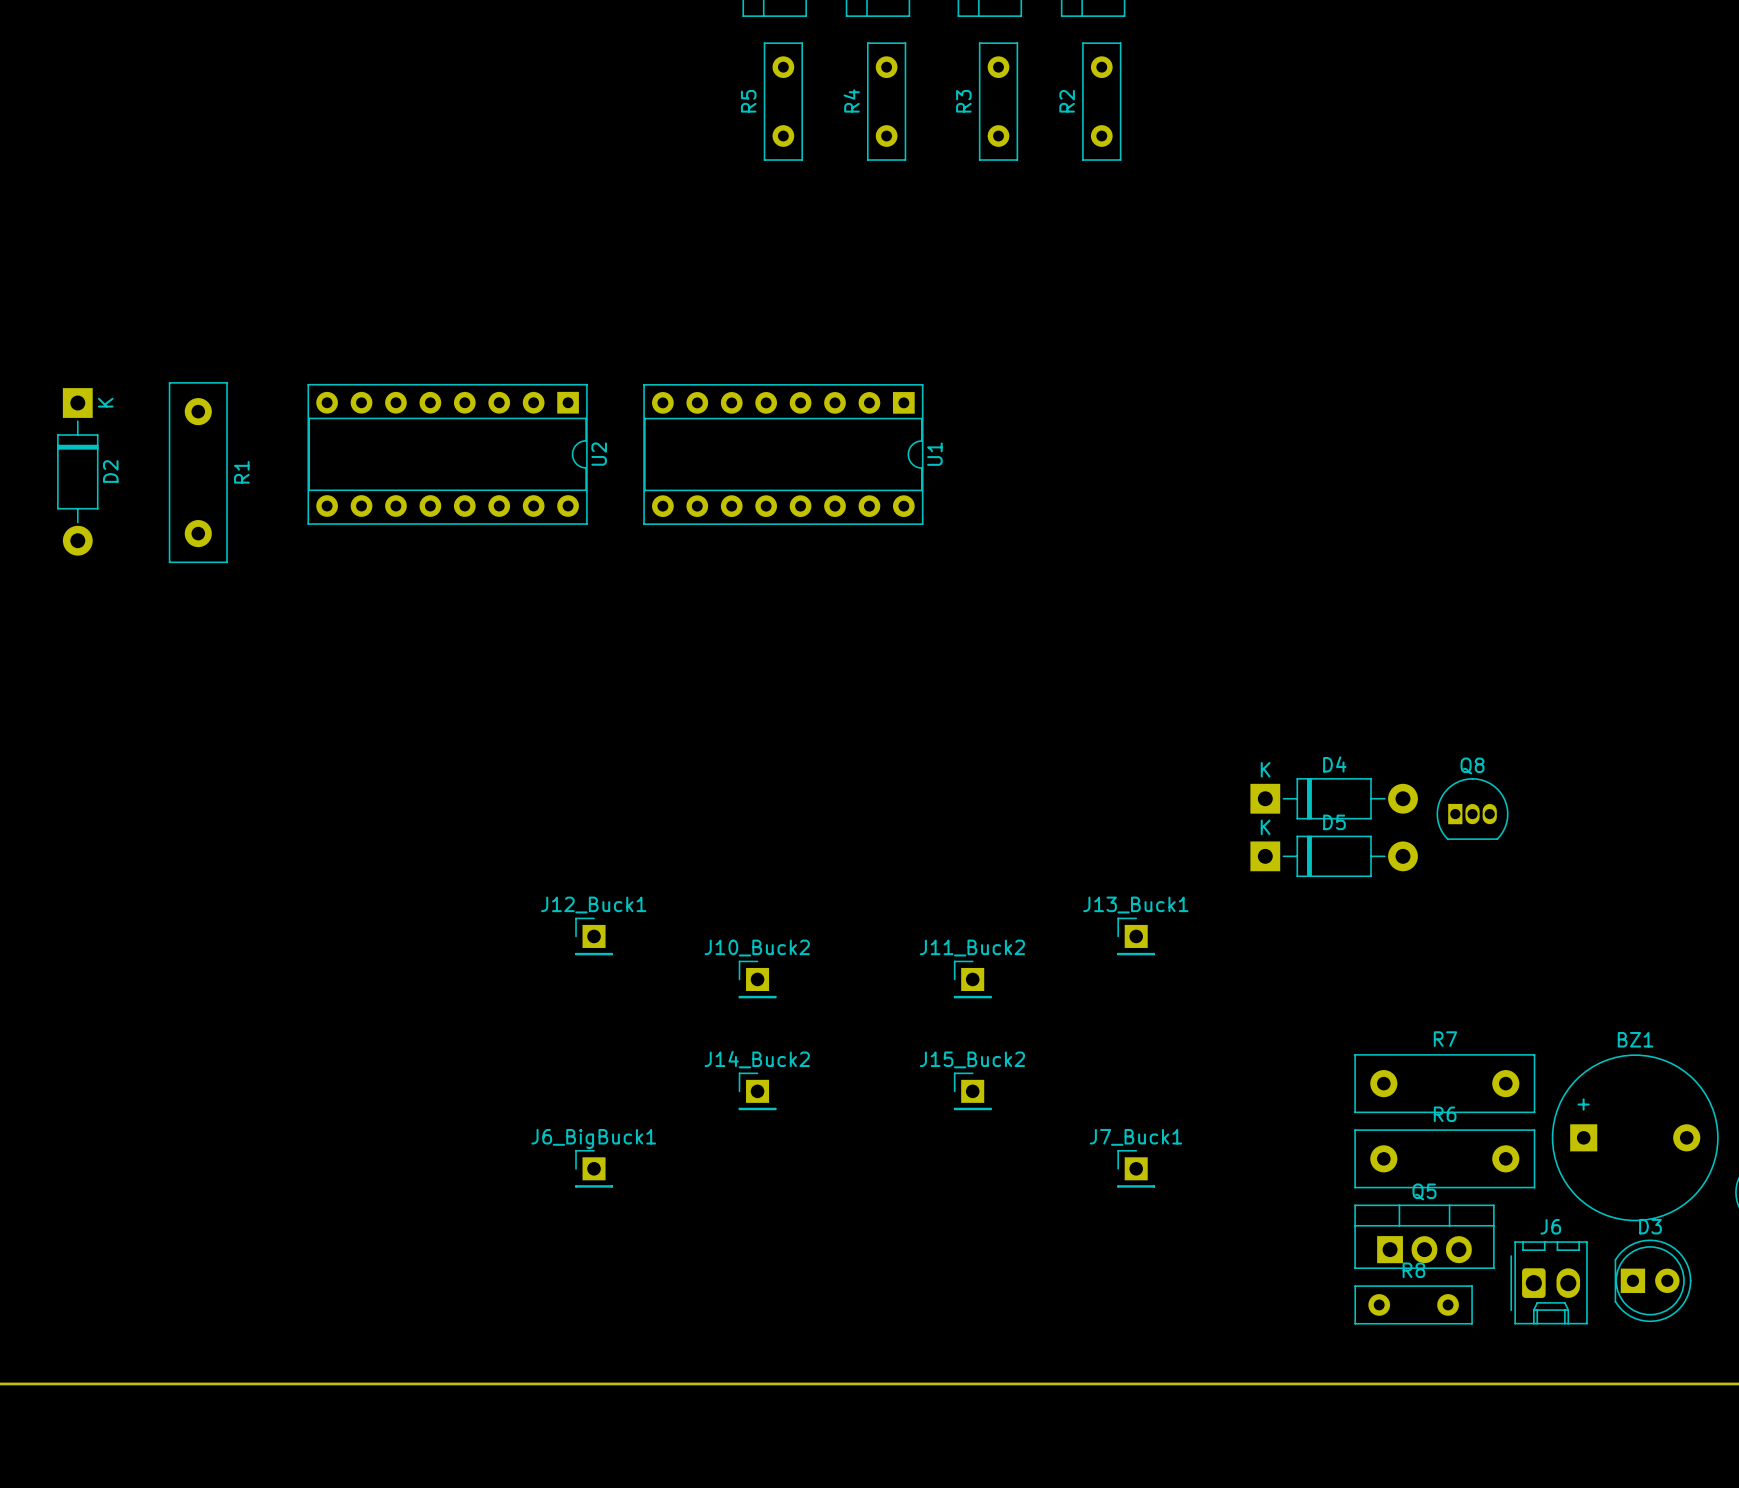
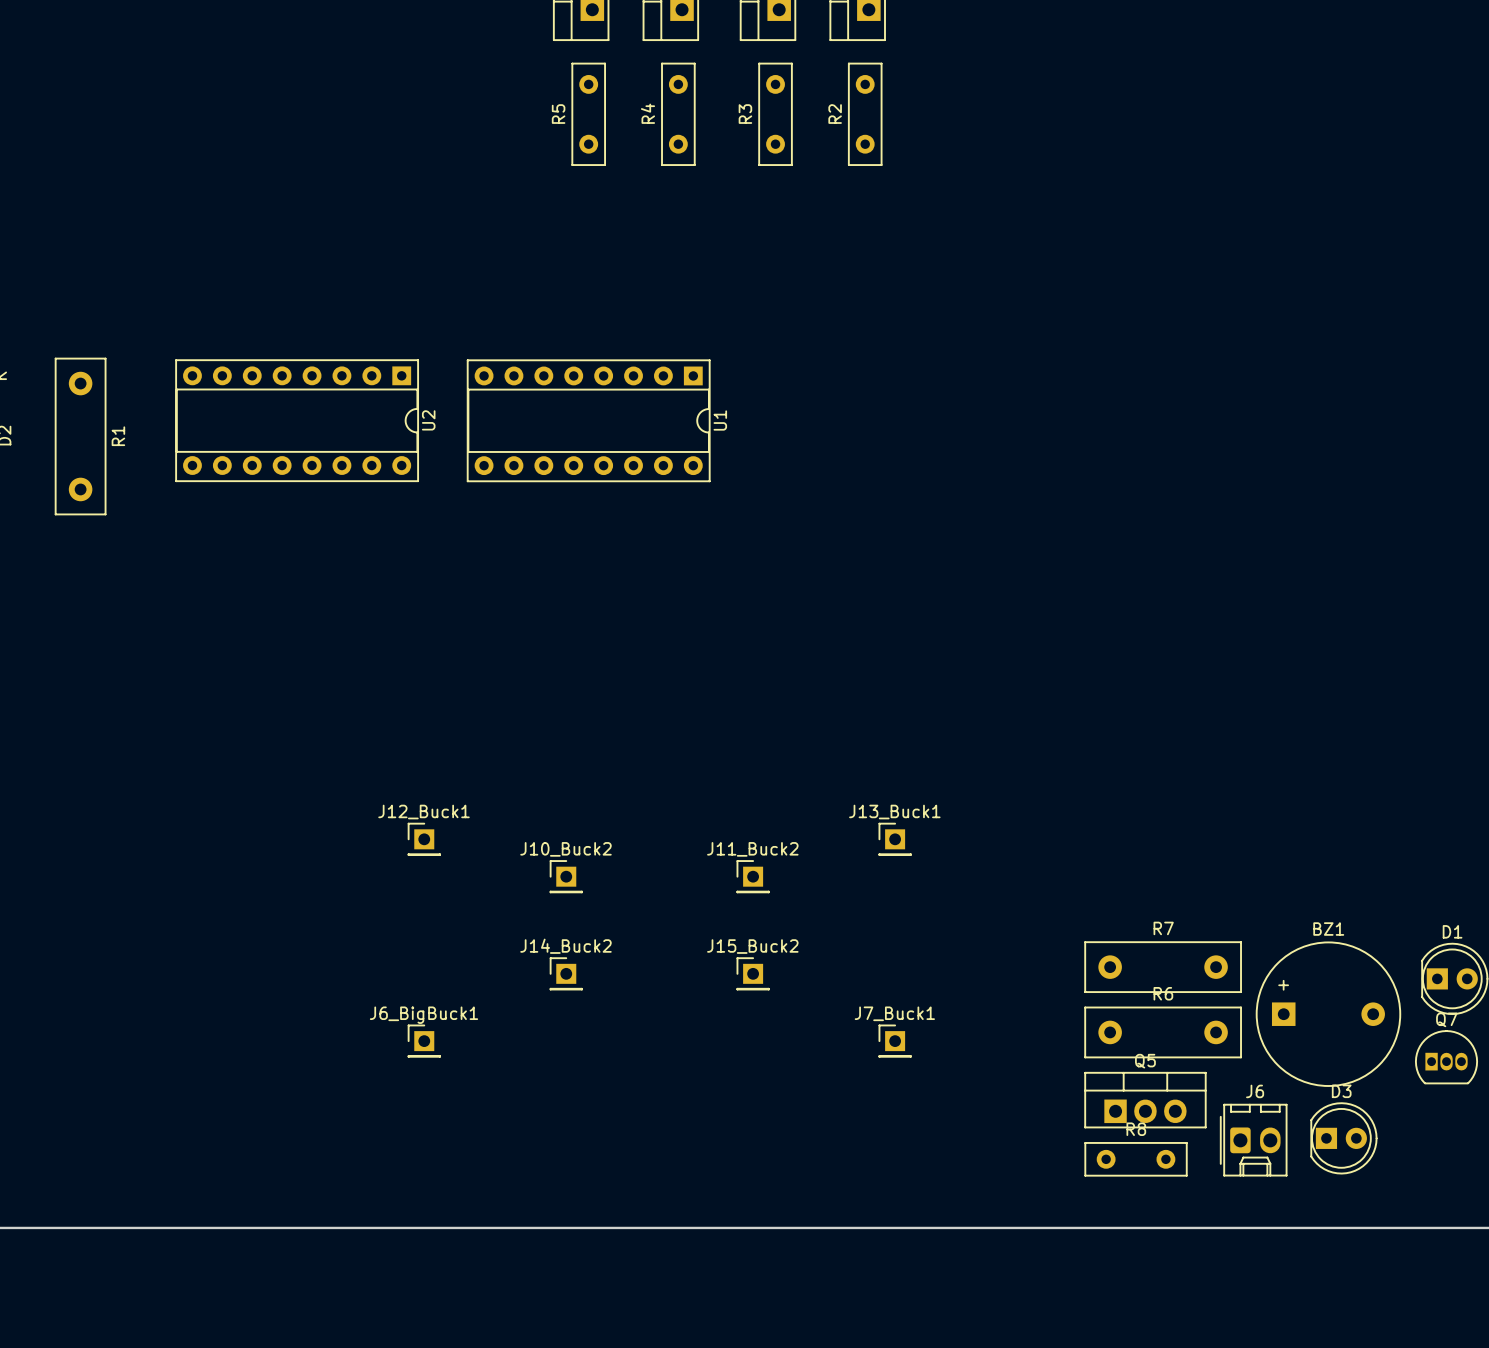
D4: (1334, 798) -> none
Q8: (1472, 808) -> none
D5: (1334, 856) -> none

